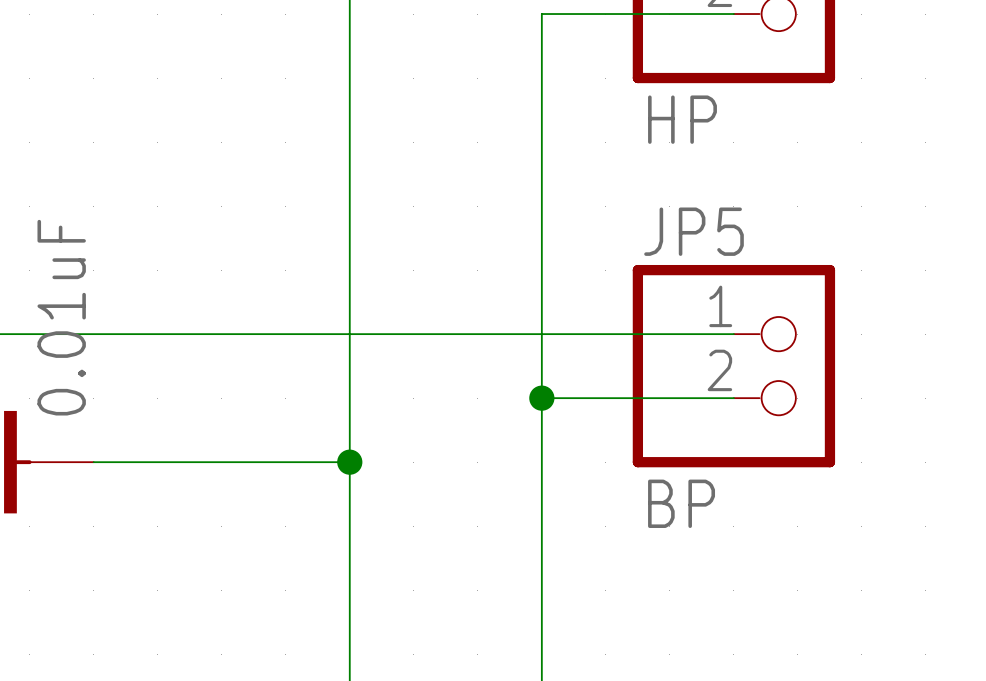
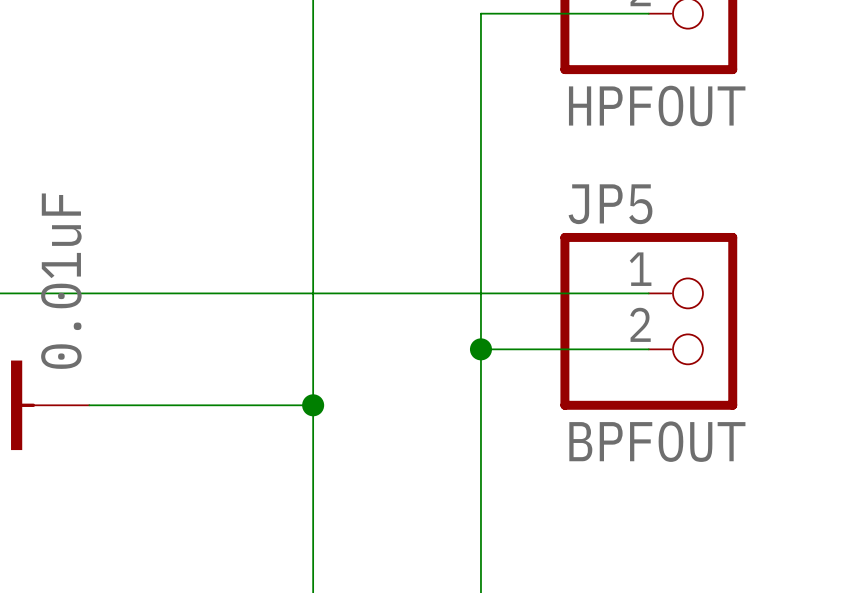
part value: HP (682, 119) -> HPFOUT (657, 105)
JP5 value: BP (681, 503) -> BPFOUT (657, 441)

